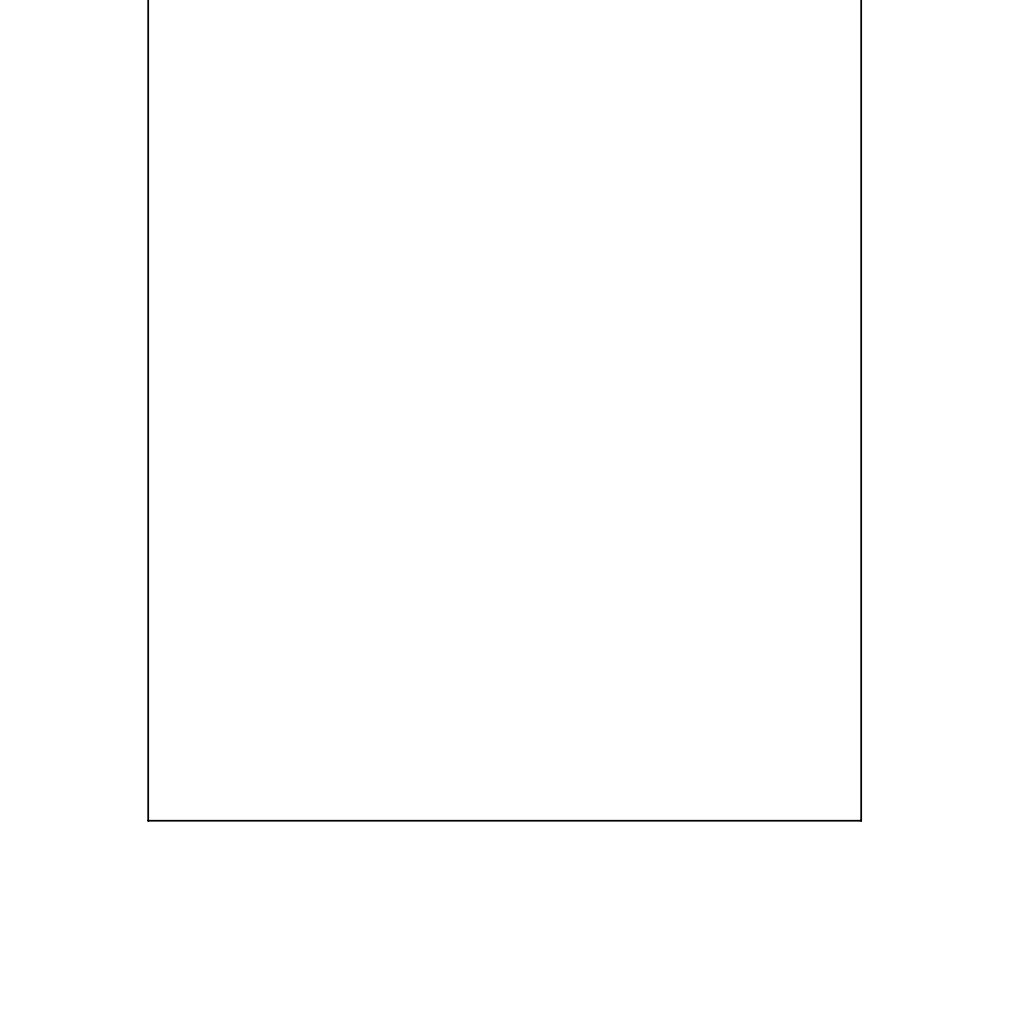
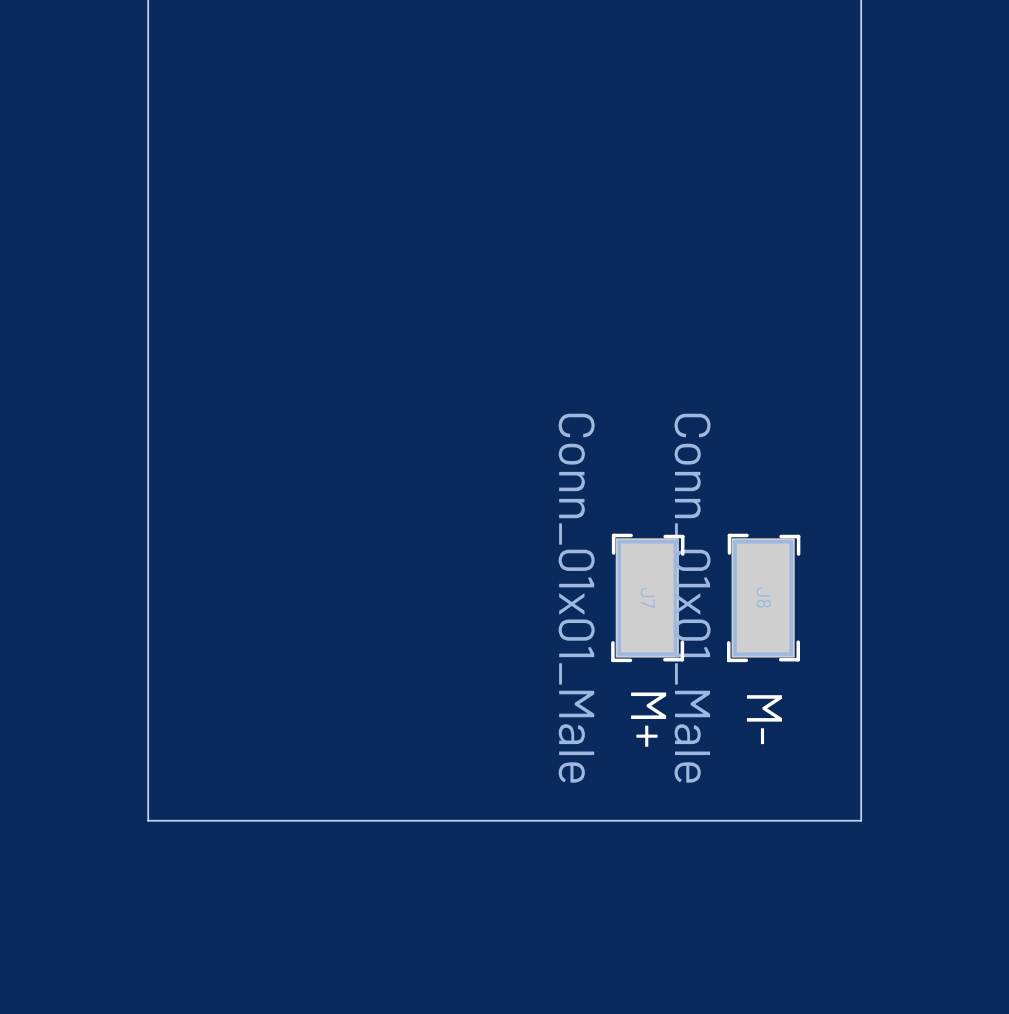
part: none -> Conn_01x01_Male (647, 597)
part: none -> Conn_01x01_Male (763, 597)
text: none -> M+ (648, 719)
text: none -> M- (764, 719)

